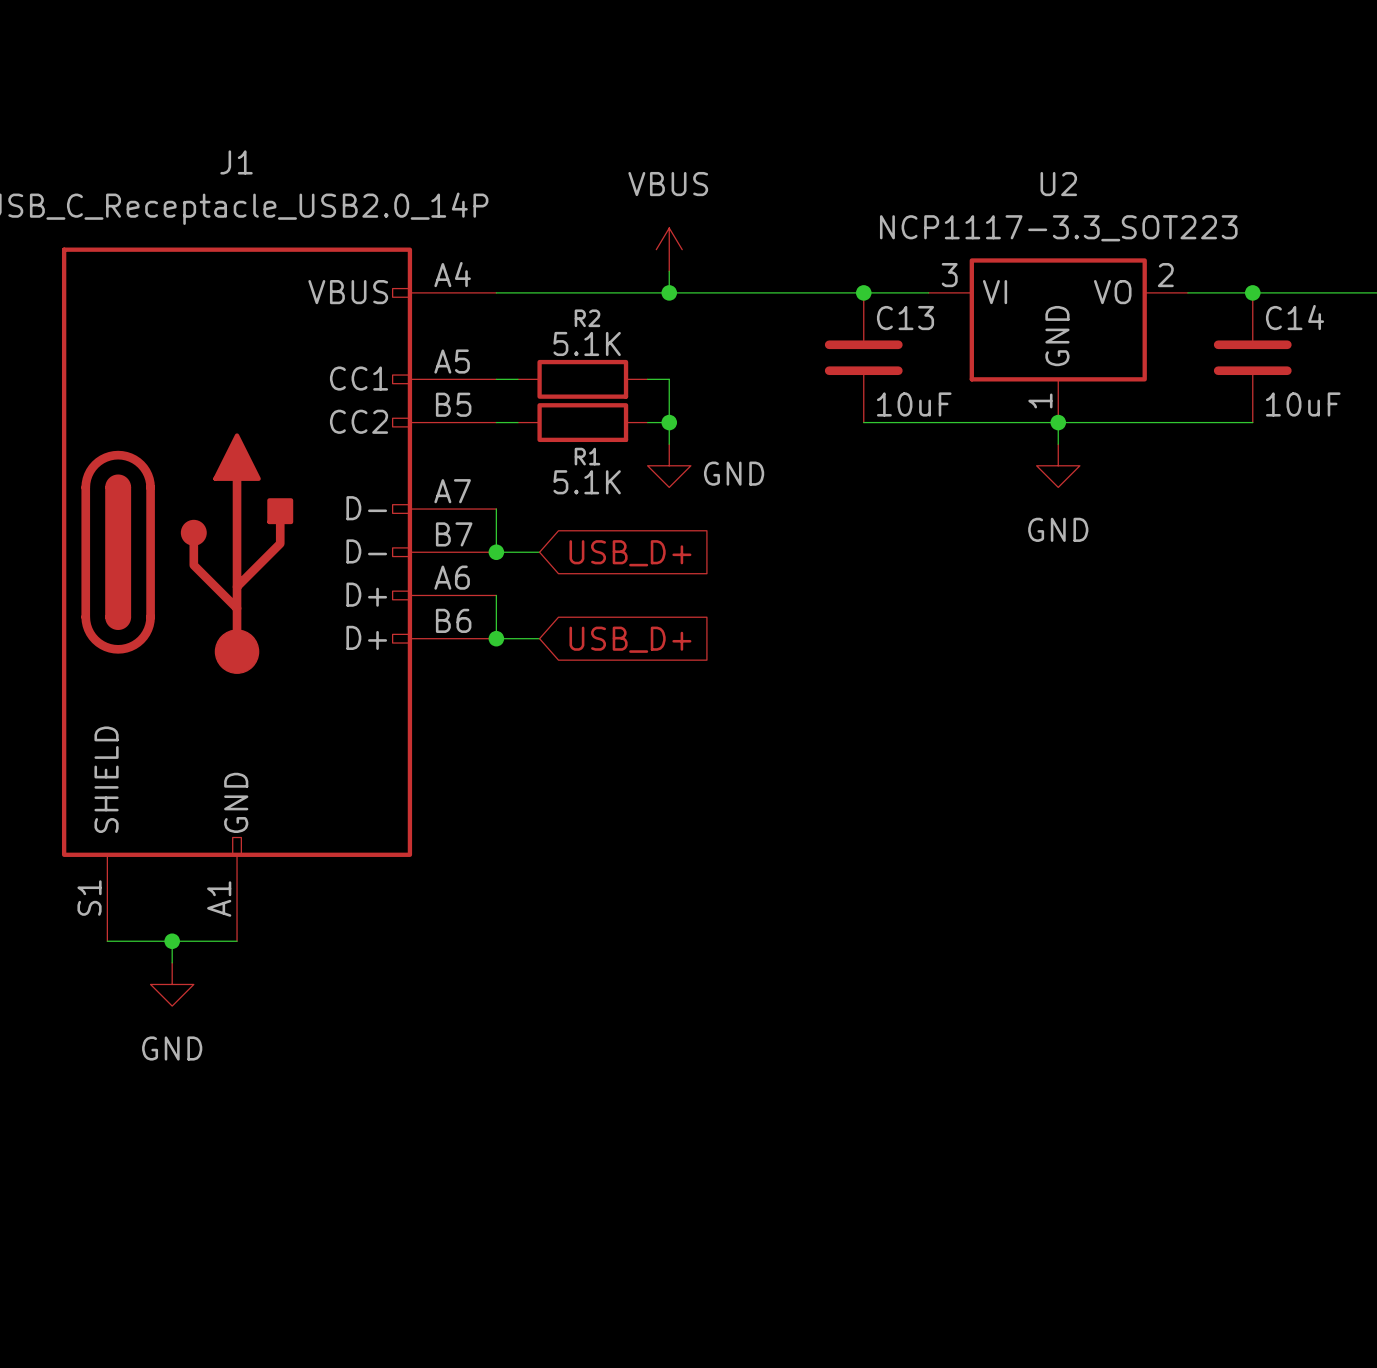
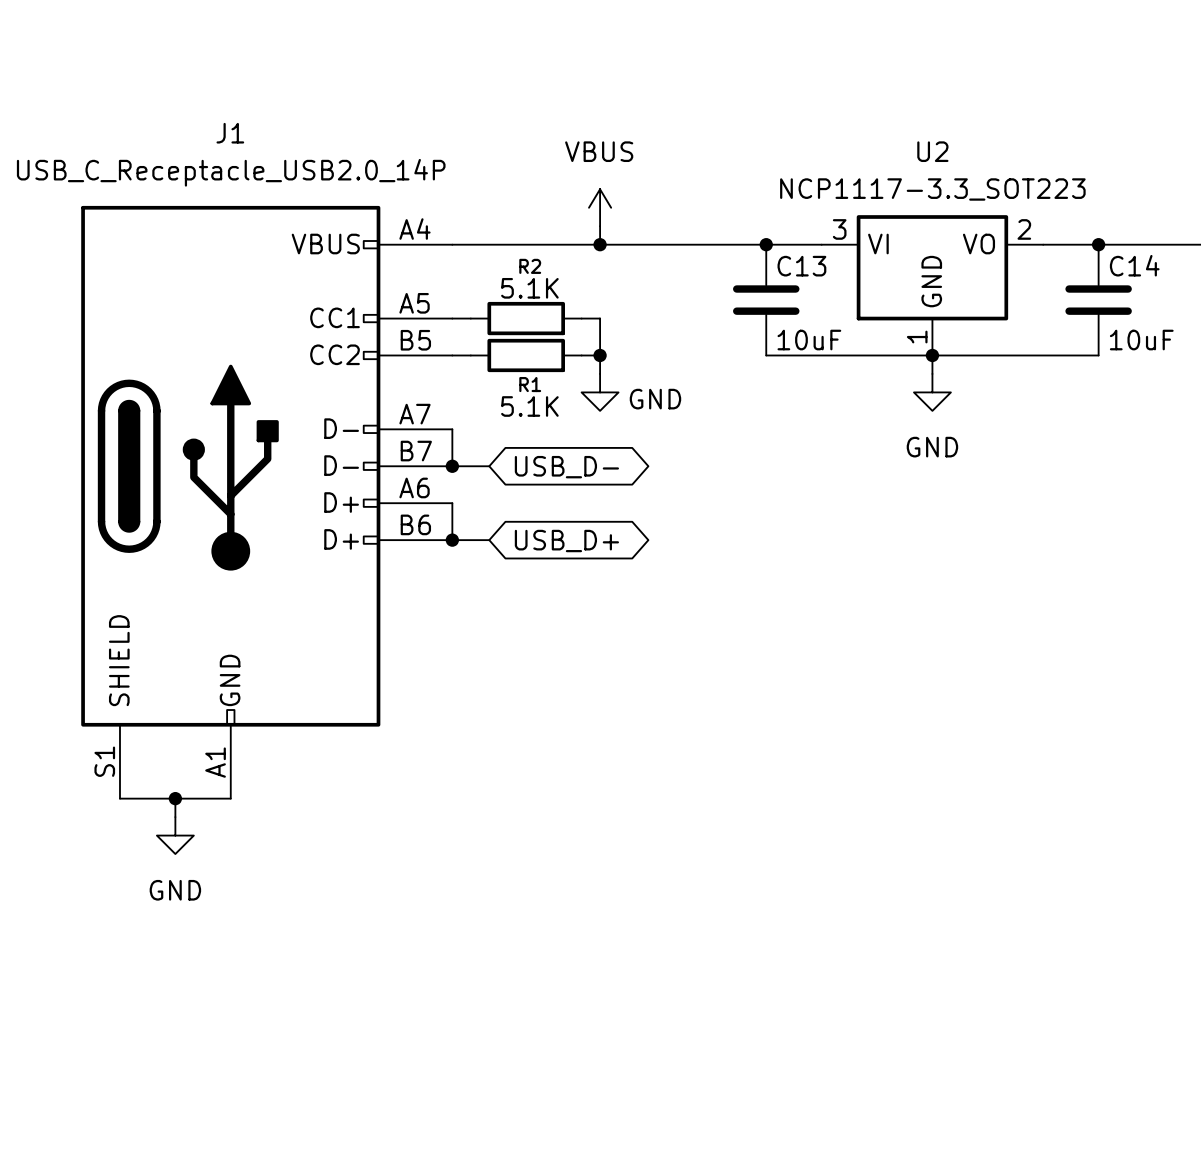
global label shape: input (630, 553) -> bidirectional (566, 467)
global label: USB_D+ (630, 553) -> USB_D- (566, 467)
global label shape: input (630, 639) -> bidirectional (566, 541)

